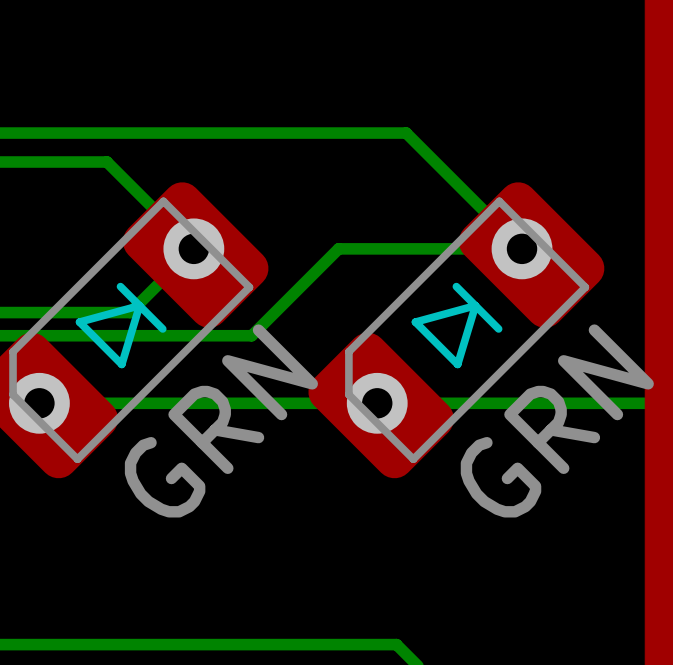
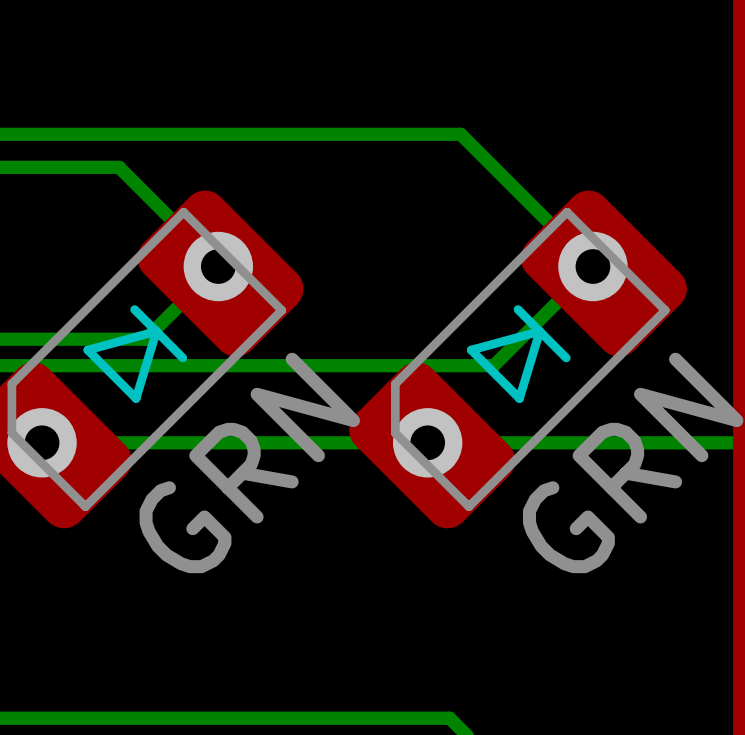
bottom track: (522, 248) (338, 248) (251, 335) -> (592, 266) (493, 365) (284, 365)

